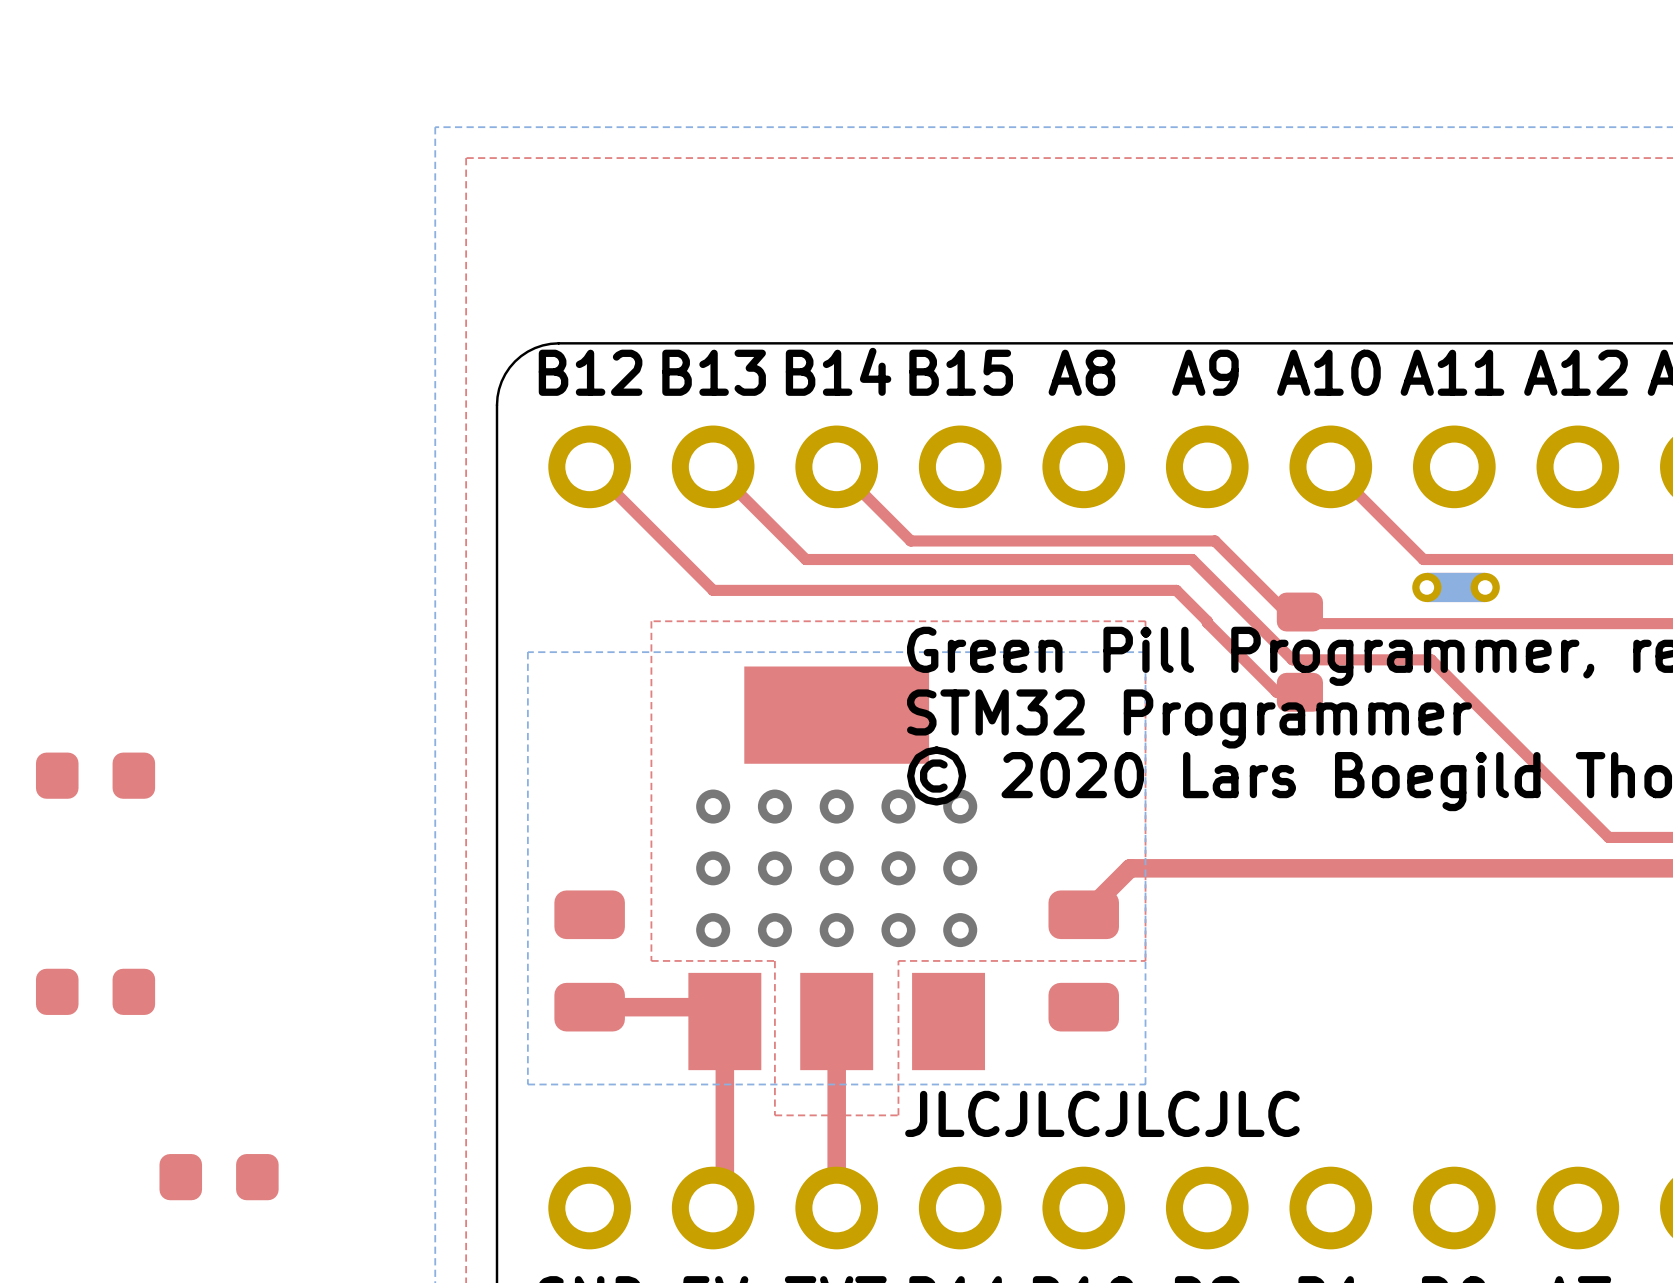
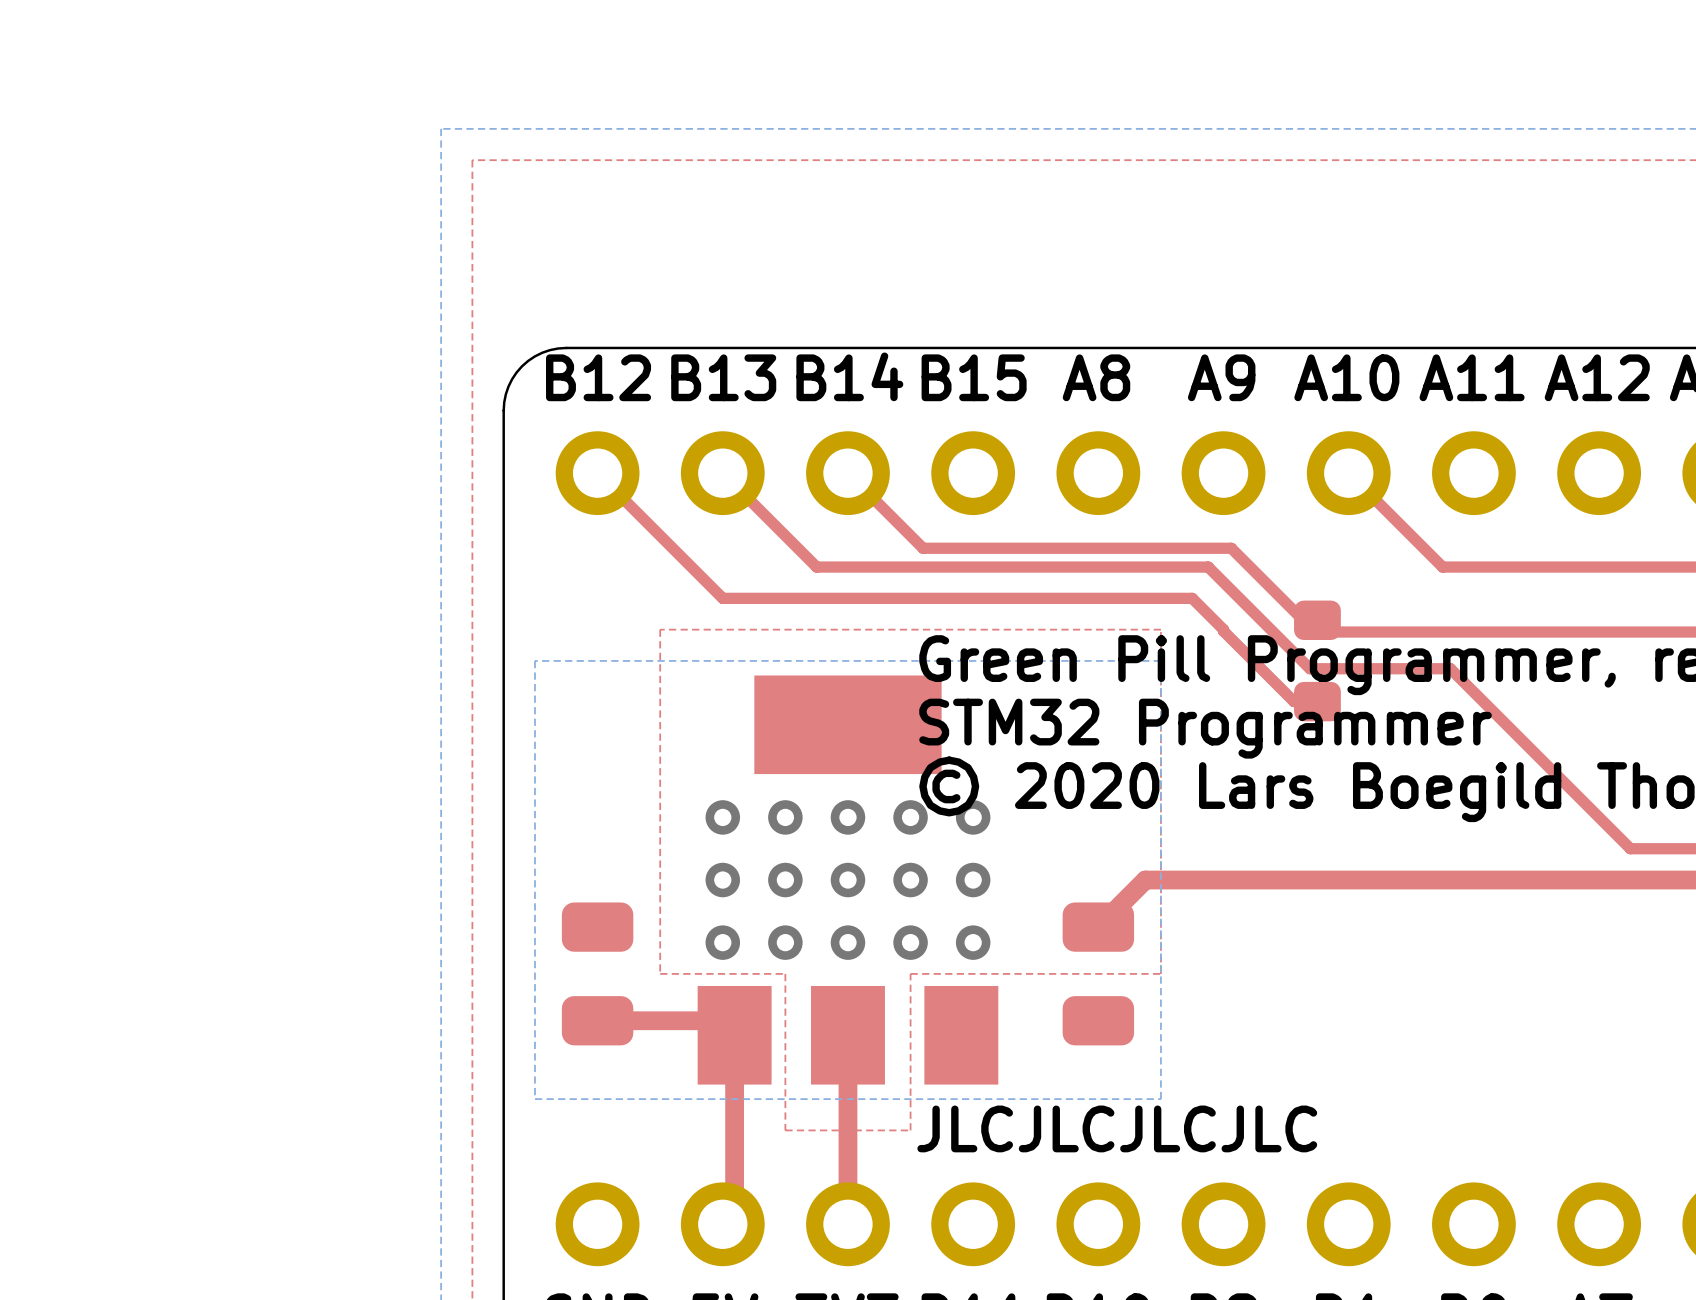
part: (1456, 587) -> none
part: (95, 775) -> none
part: (95, 991) -> none
part: (219, 1177) -> none

